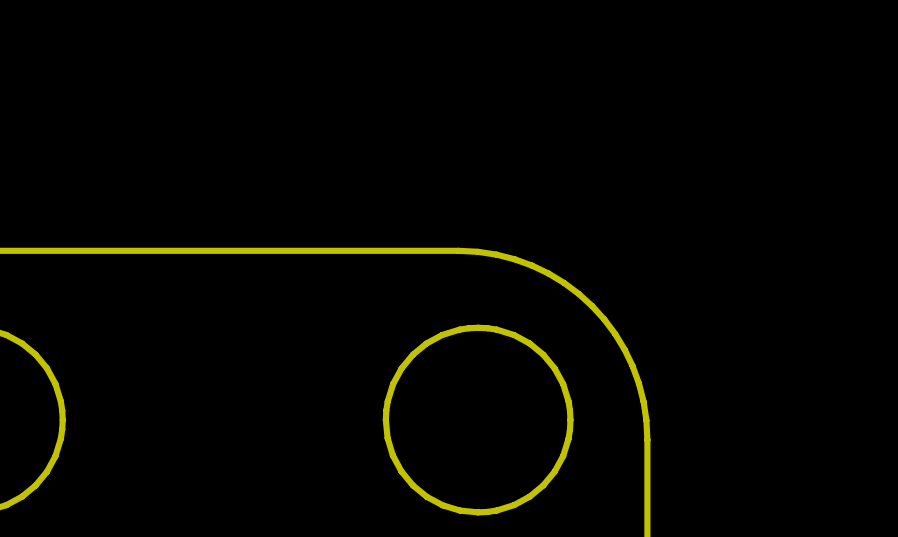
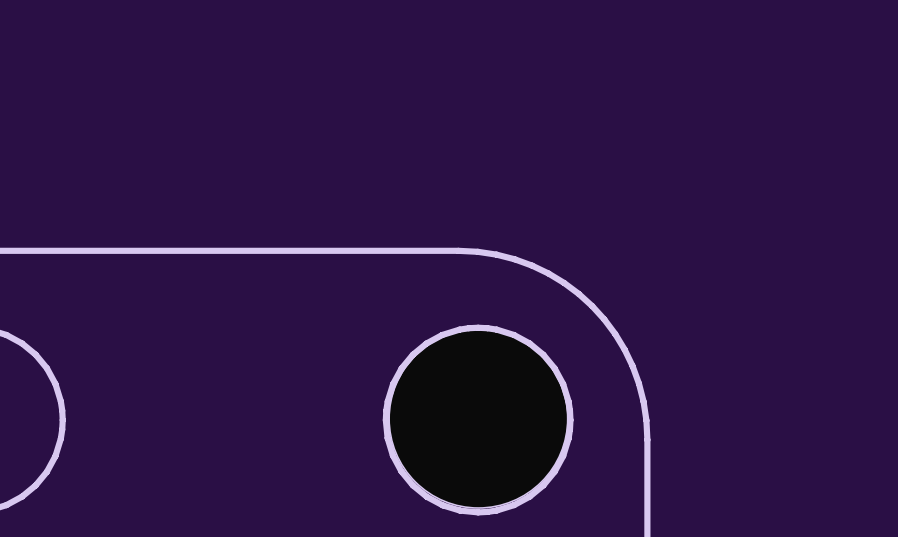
part: none -> (478, 418)

